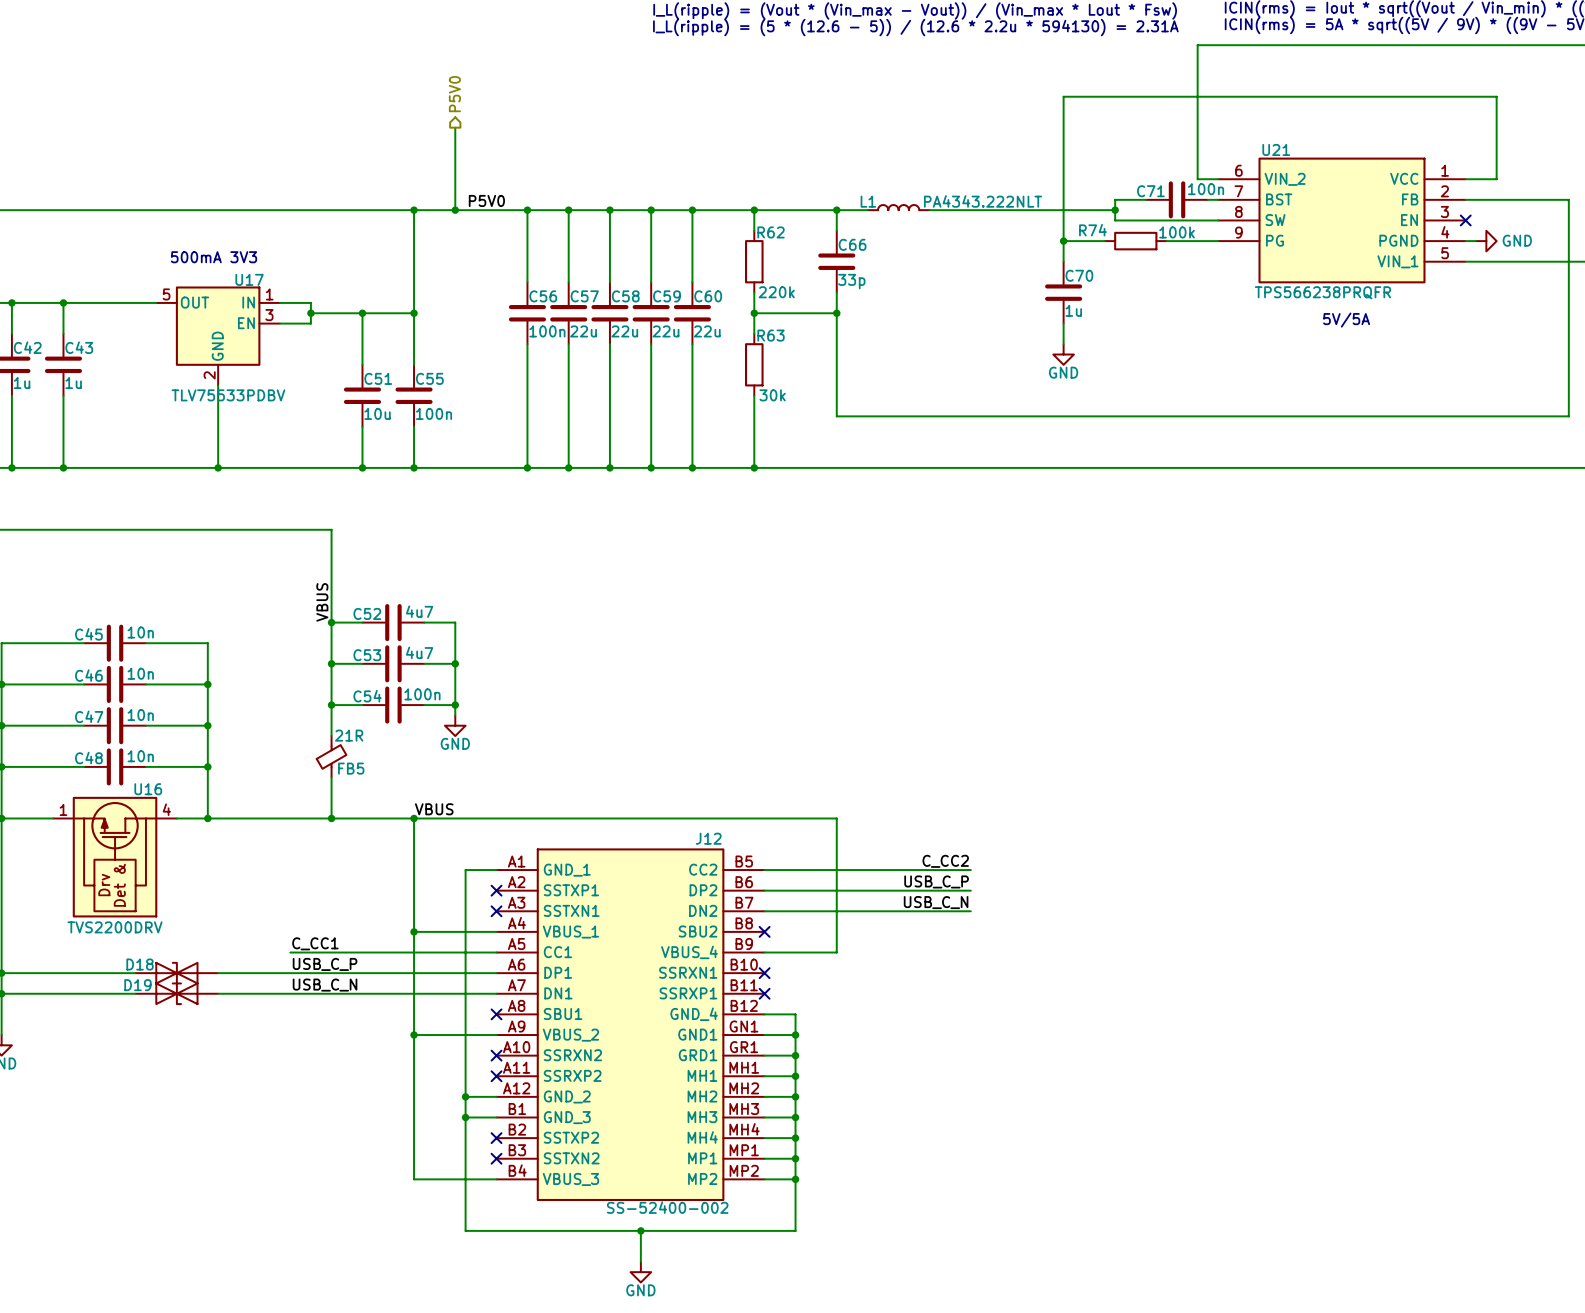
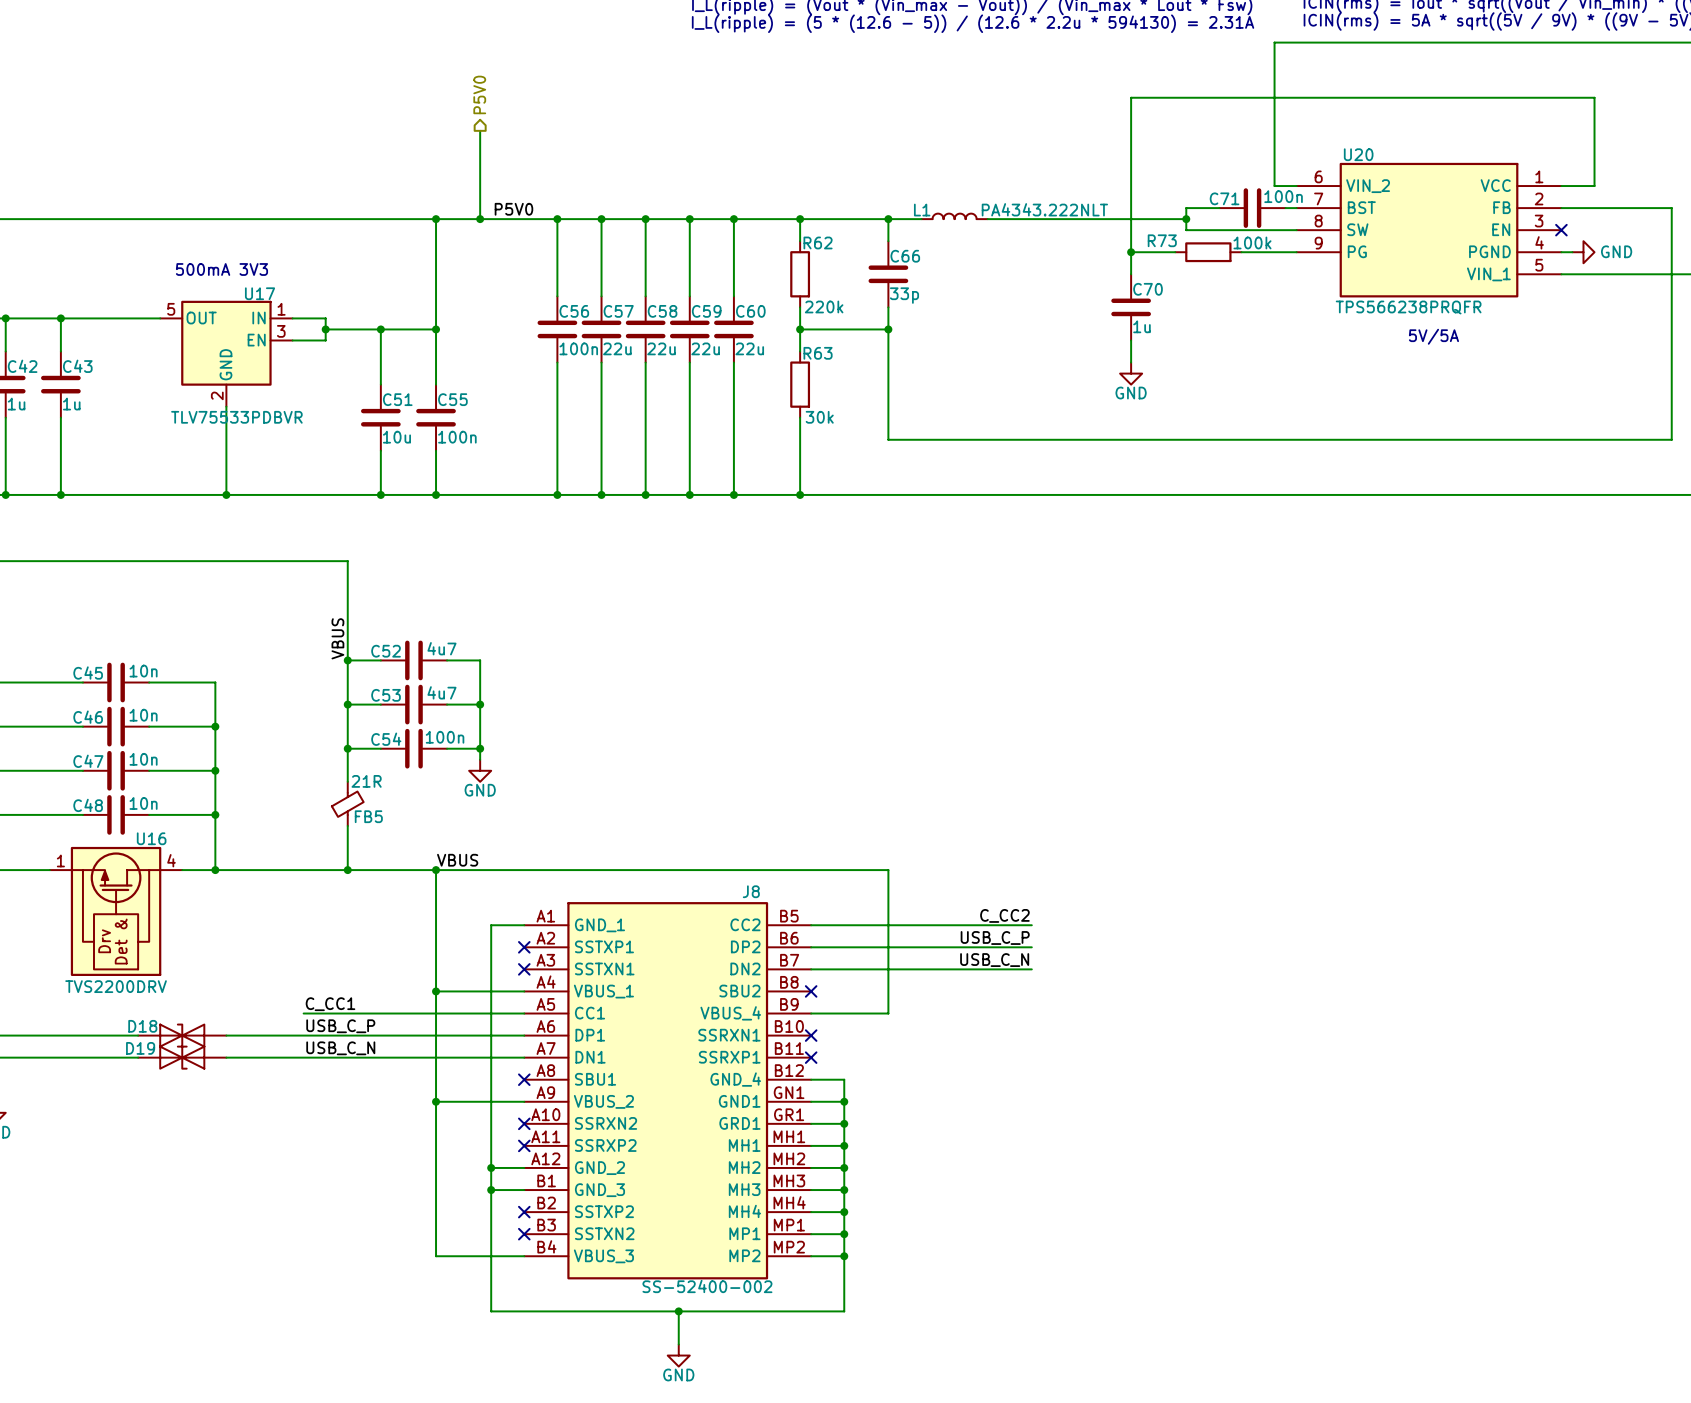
U21 name: U21 (1276, 149) -> U20 (1358, 154)
R74 name: R74 (1092, 230) -> R73 (1162, 240)
U17 value: TLV75533PDBV (228, 395) -> TLV75533PDBVR (236, 417)
J12 name: J12 (708, 838) -> J8 (751, 891)

